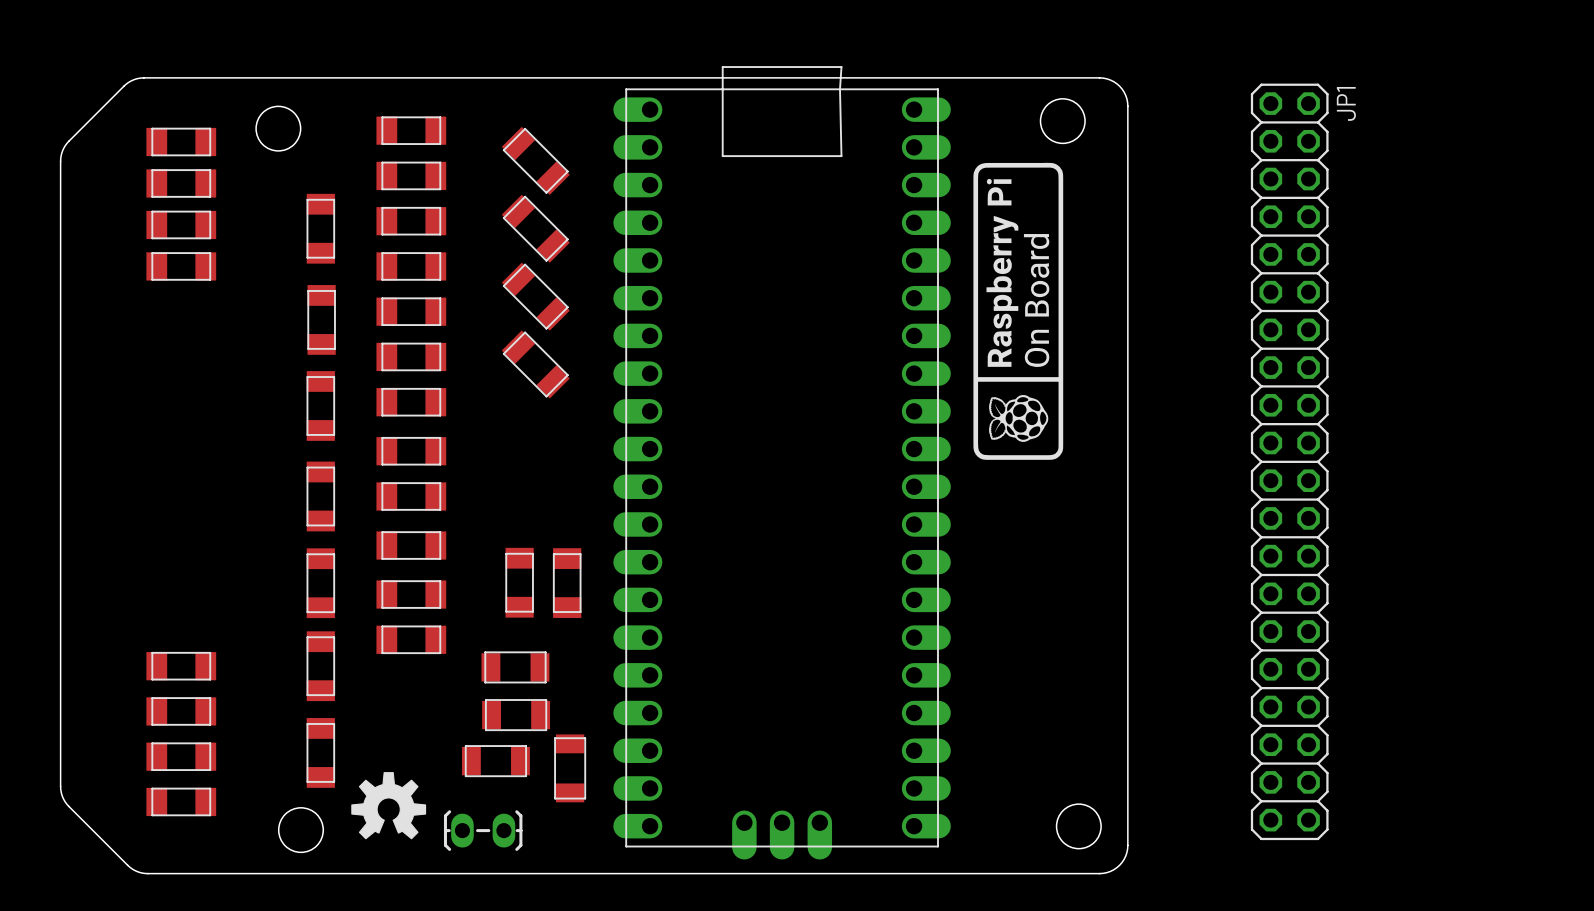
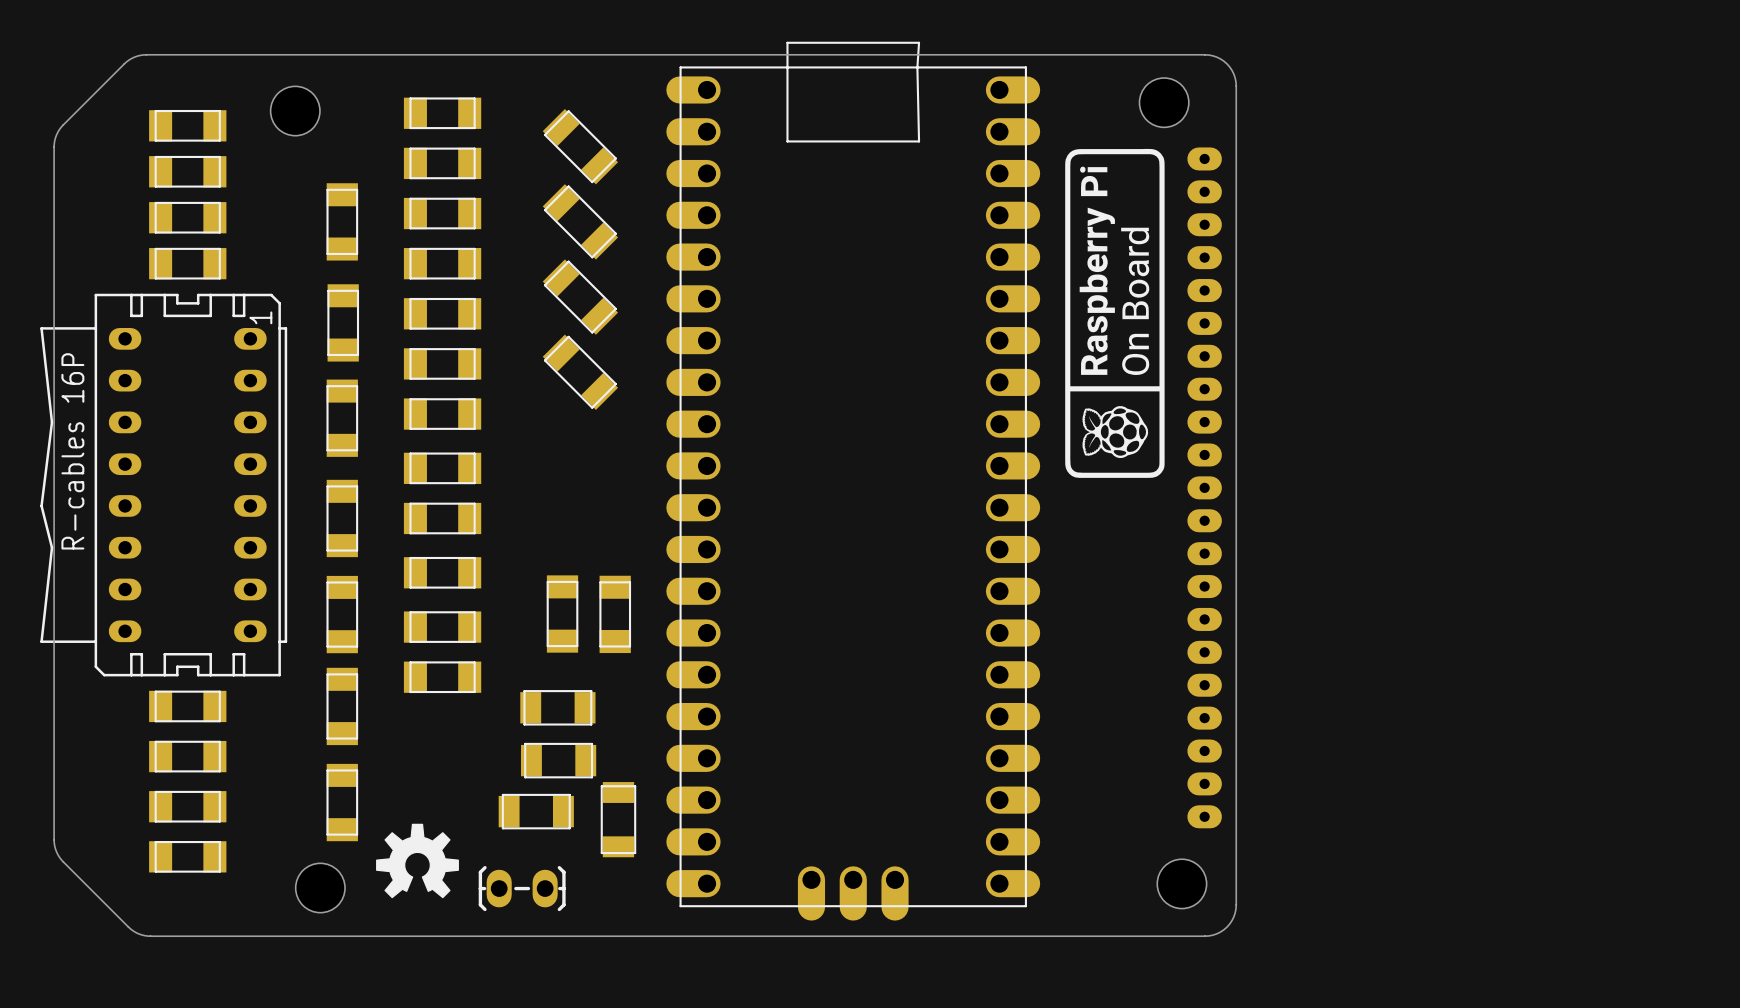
JP1: (1289, 461) -> none
part: none -> (163, 485)
part: none -> (1204, 487)

